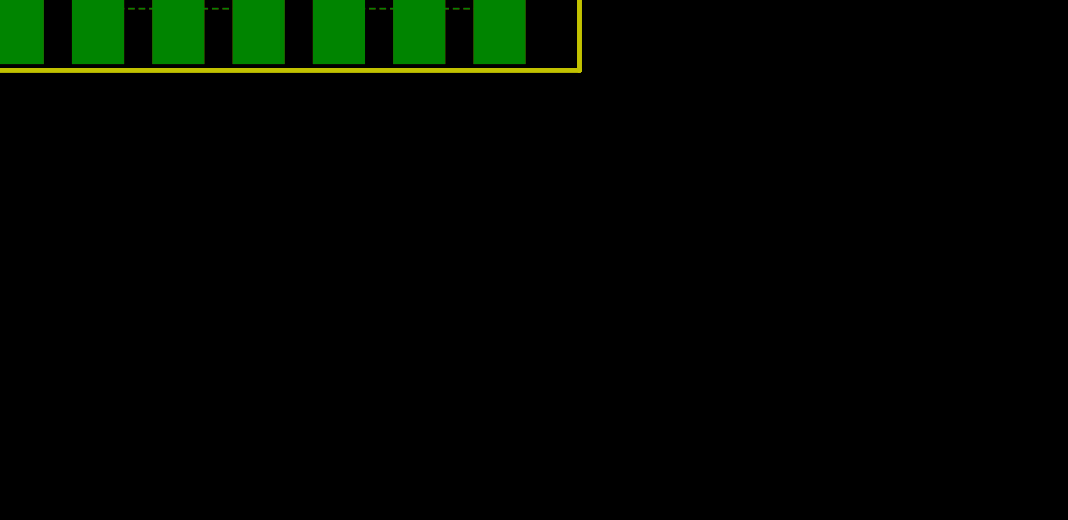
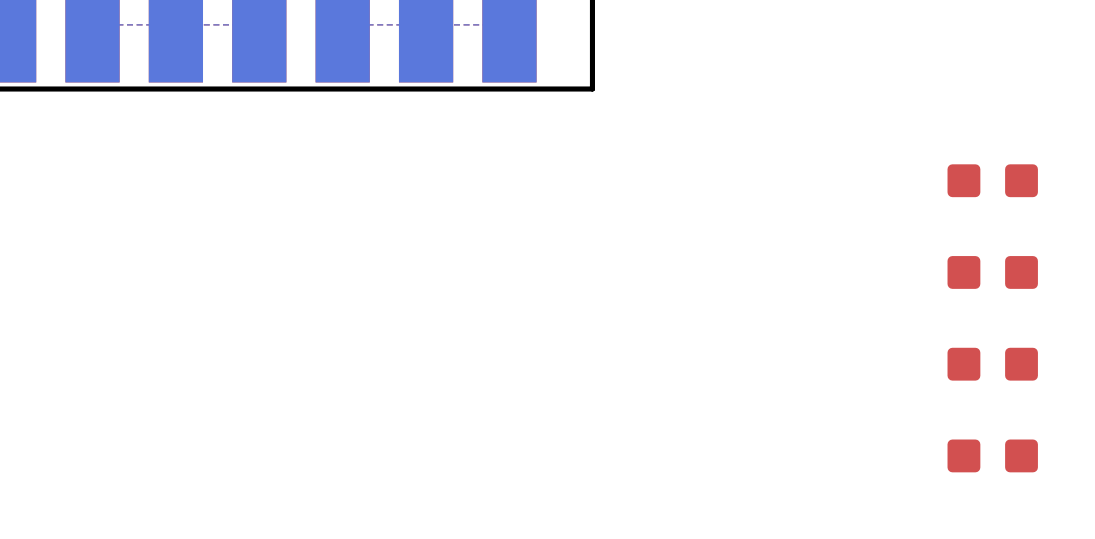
part: none -> (992, 180)
part: none -> (992, 272)
part: none -> (992, 364)
part: none -> (992, 455)

